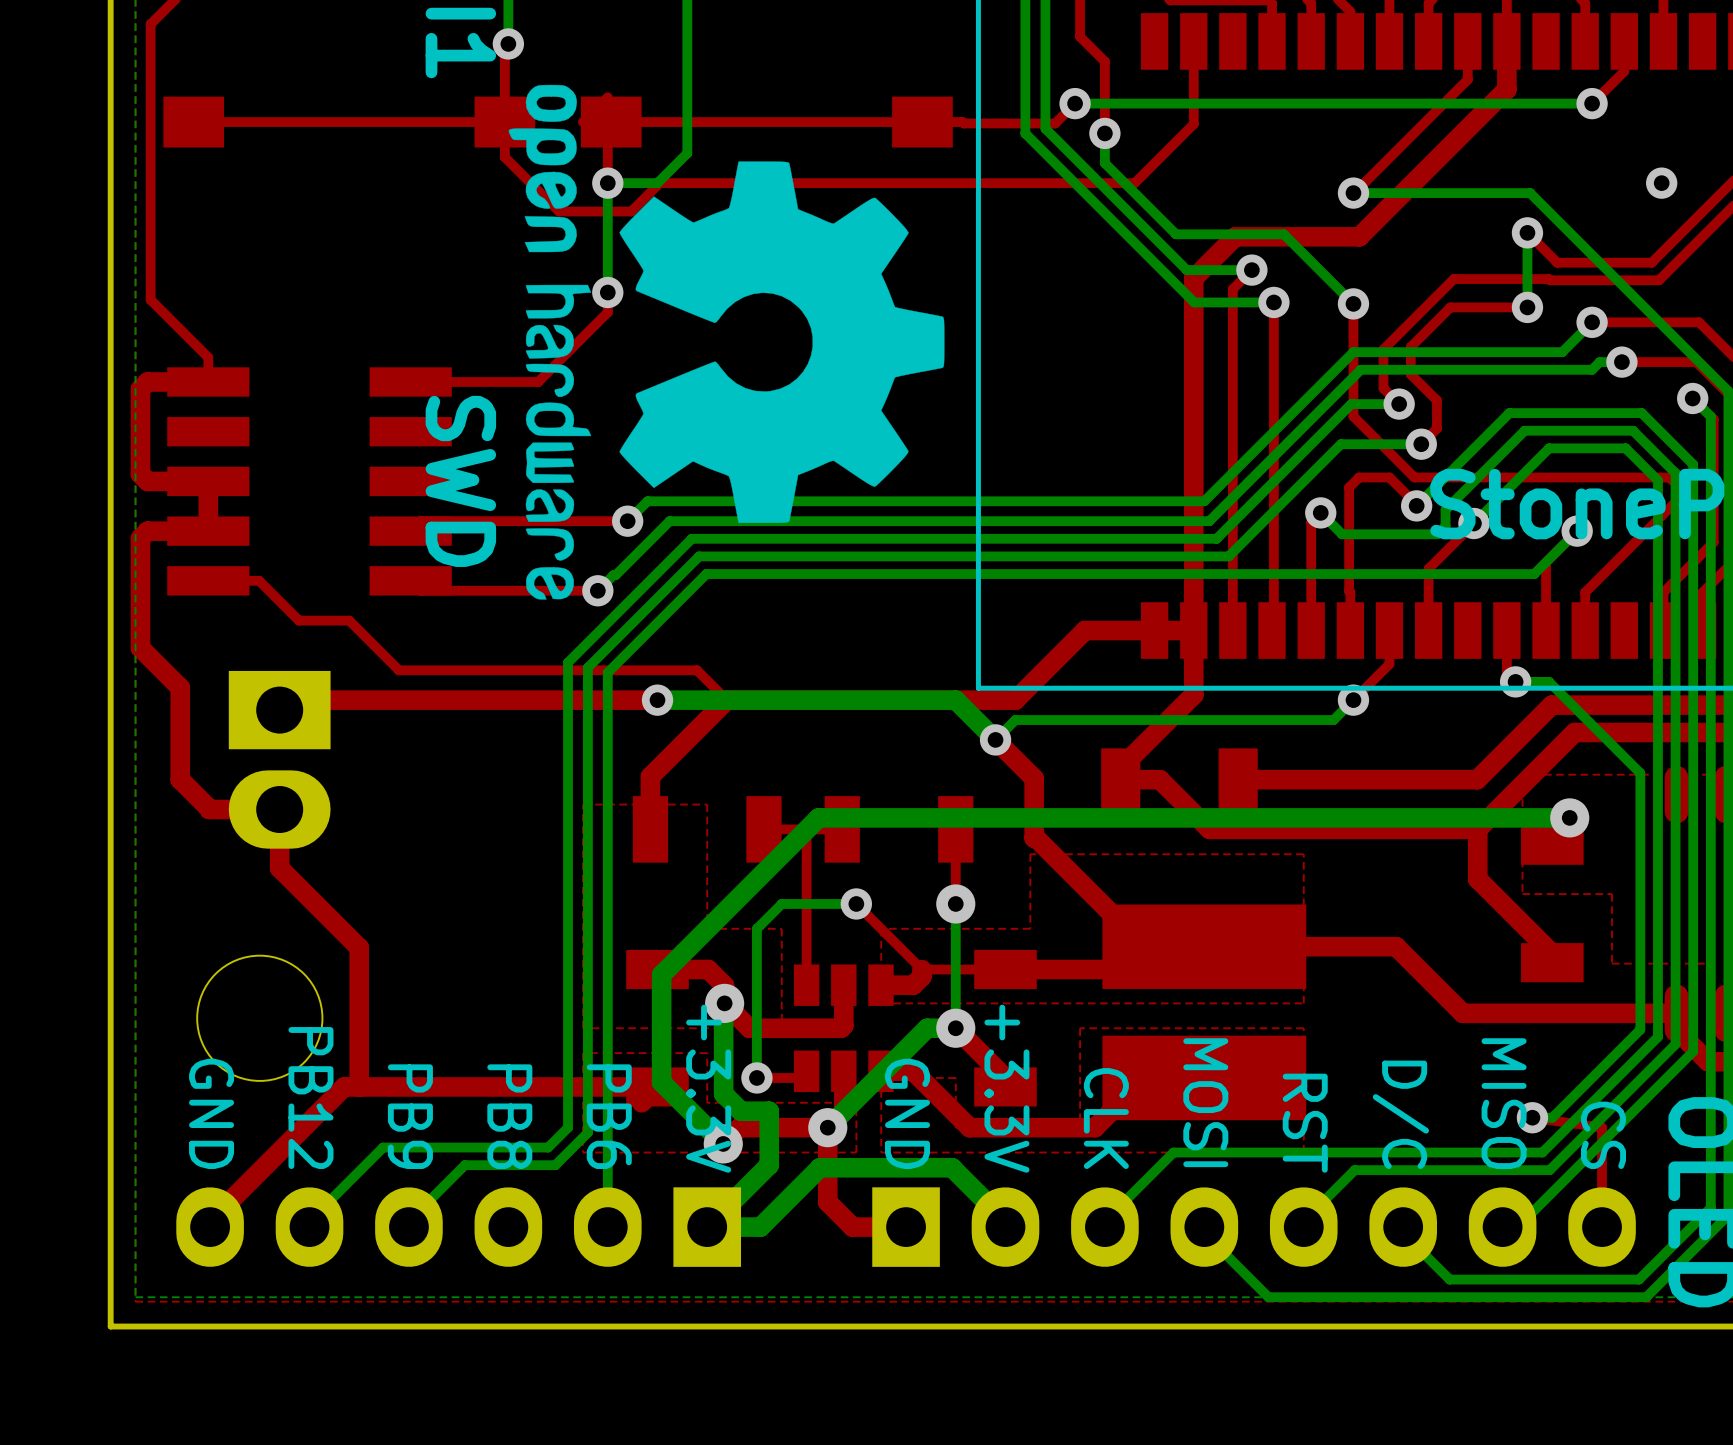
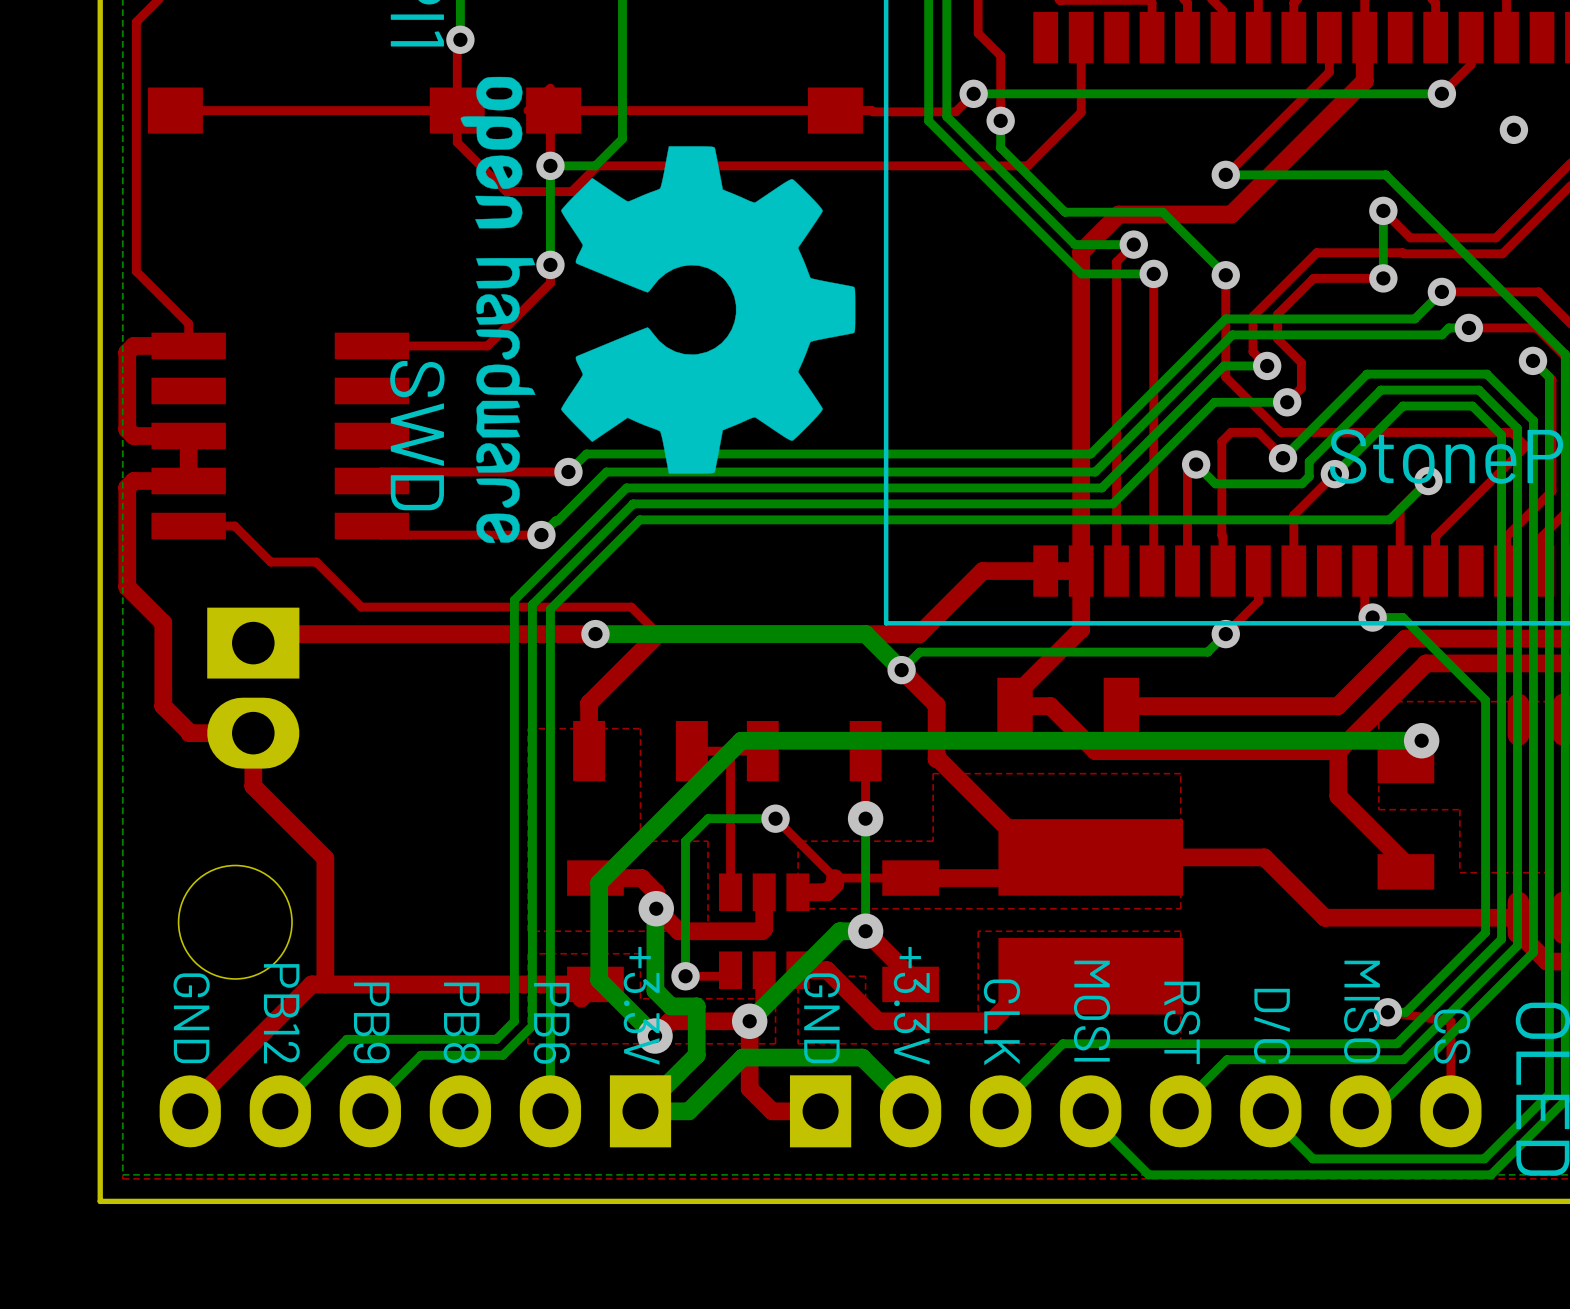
via position: (1661, 183) -> (1513, 129)

